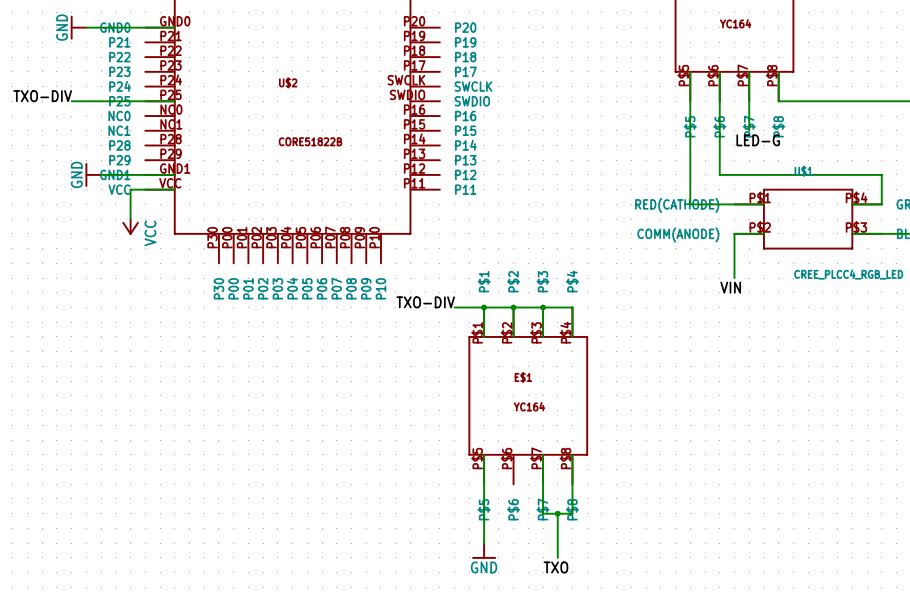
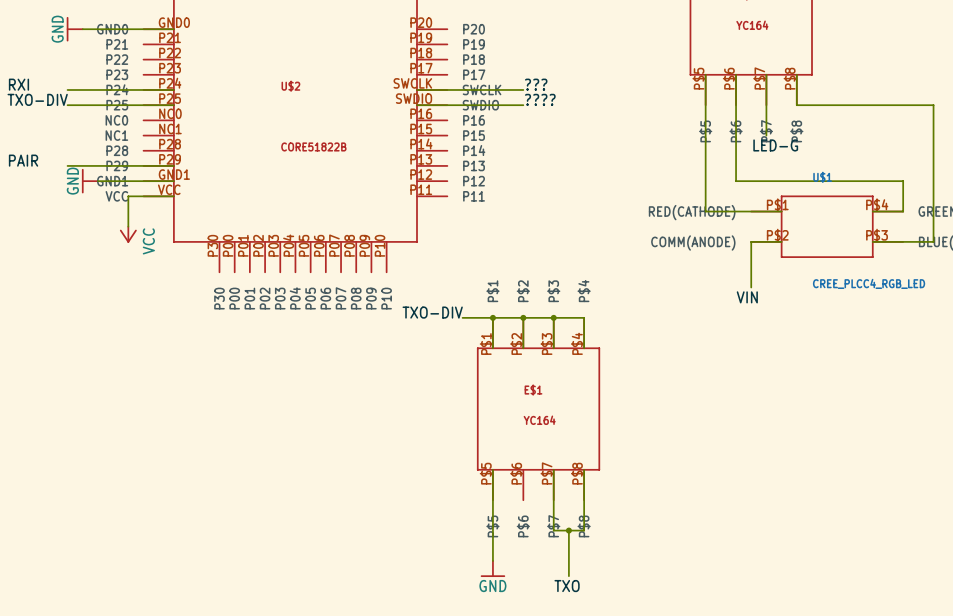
label: none -> RXI (18, 84)
label: none -> ??? (536, 84)
wire: none -> (67, 89) (173, 89)
wire: none -> (416, 89) (523, 89)
label: none -> ???? (540, 99)
wire: none -> (416, 105) (523, 105)
label: none -> PAIR (23, 160)
wire: none -> (67, 165) (173, 165)

